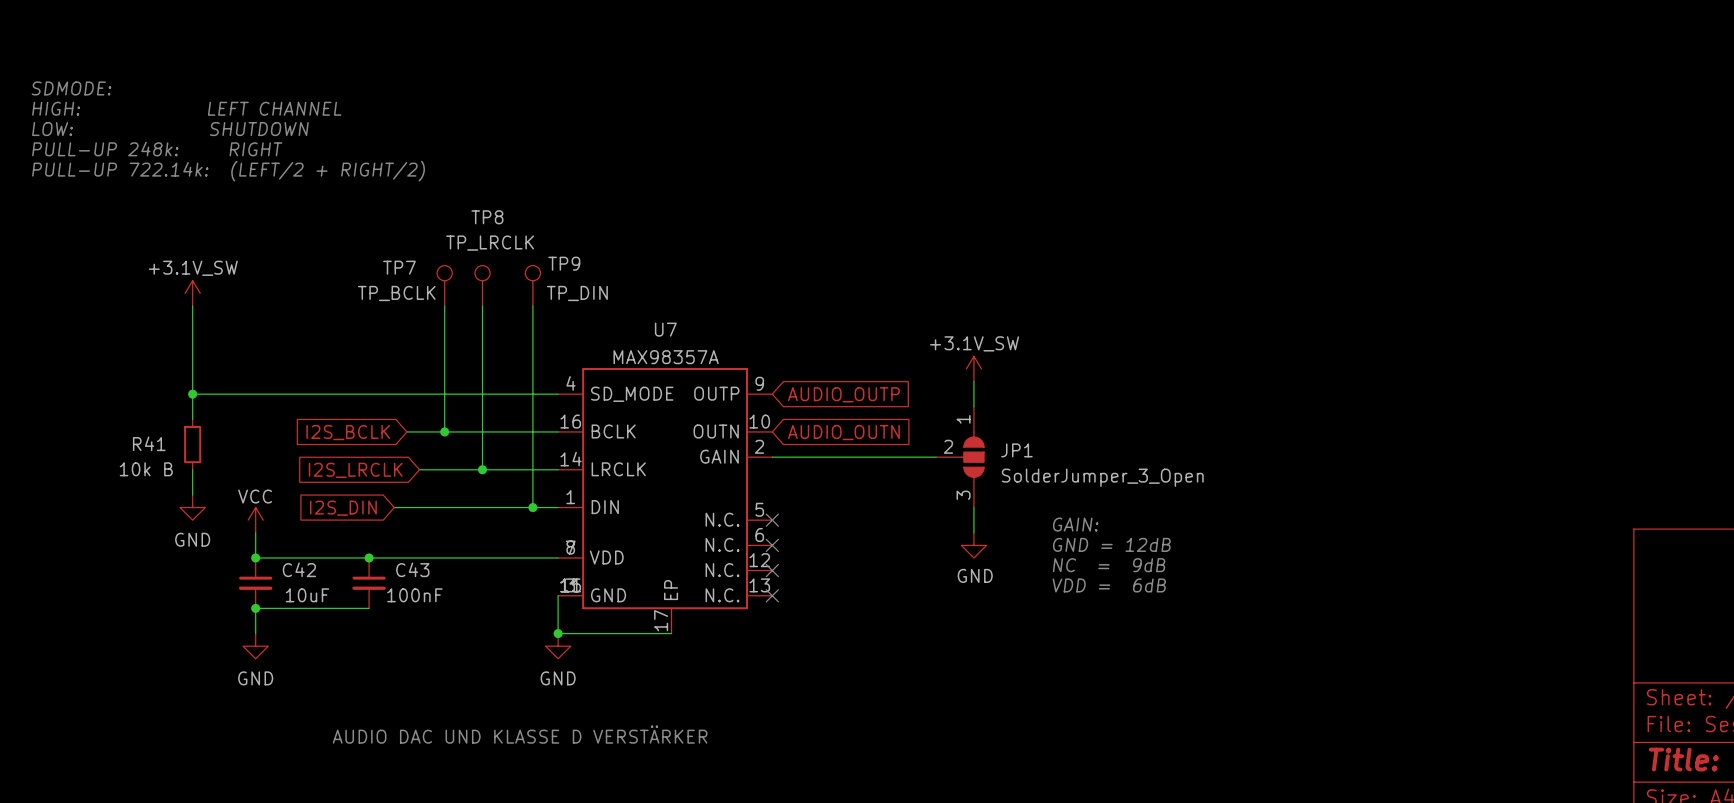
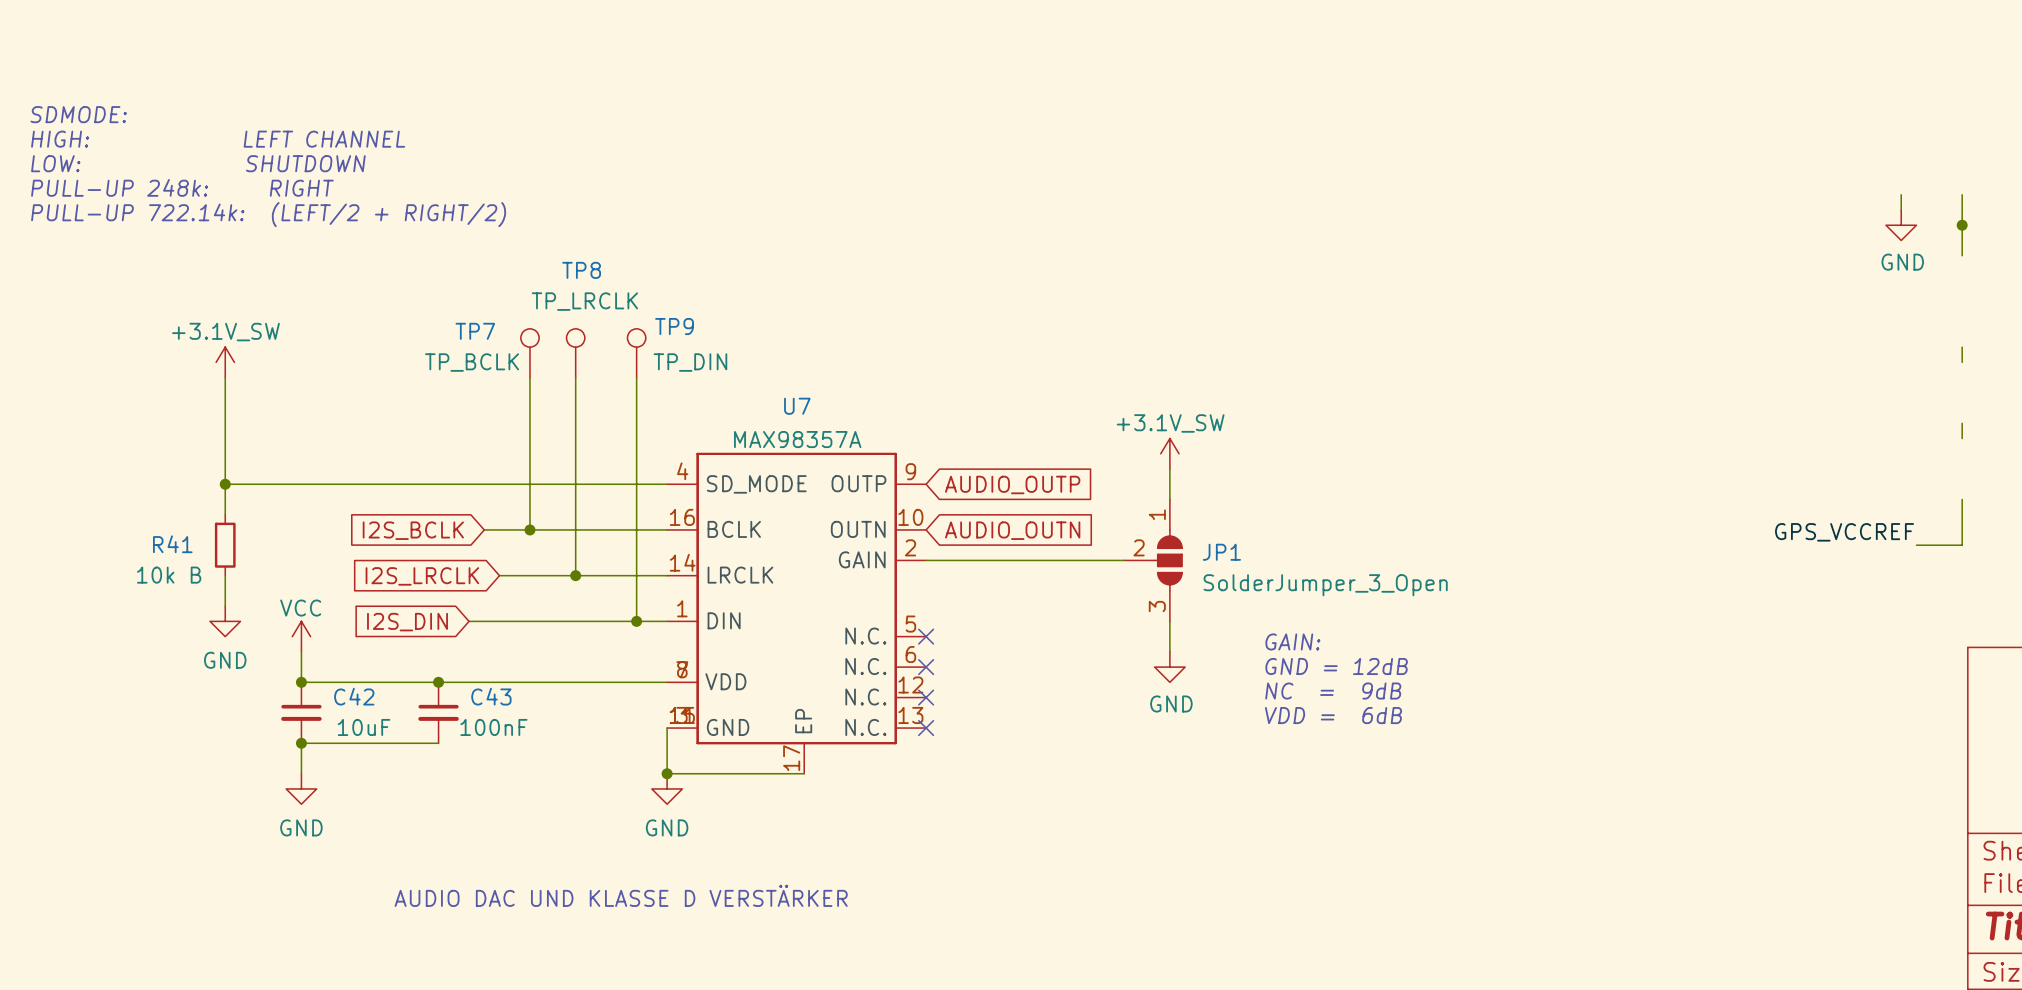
wire: none -> (1901, 194) (1901, 210)
wire: none -> (1962, 194) (1962, 255)
power symbol: none -> GND (1901, 225)
junction: none -> (1962, 225)
wire: none -> (1962, 347) (1962, 362)
wire: none -> (1962, 423) (1962, 438)
wire: none -> (1962, 499) (1962, 545) (1916, 545)
label: none -> GPS_VCCREF (1844, 532)

